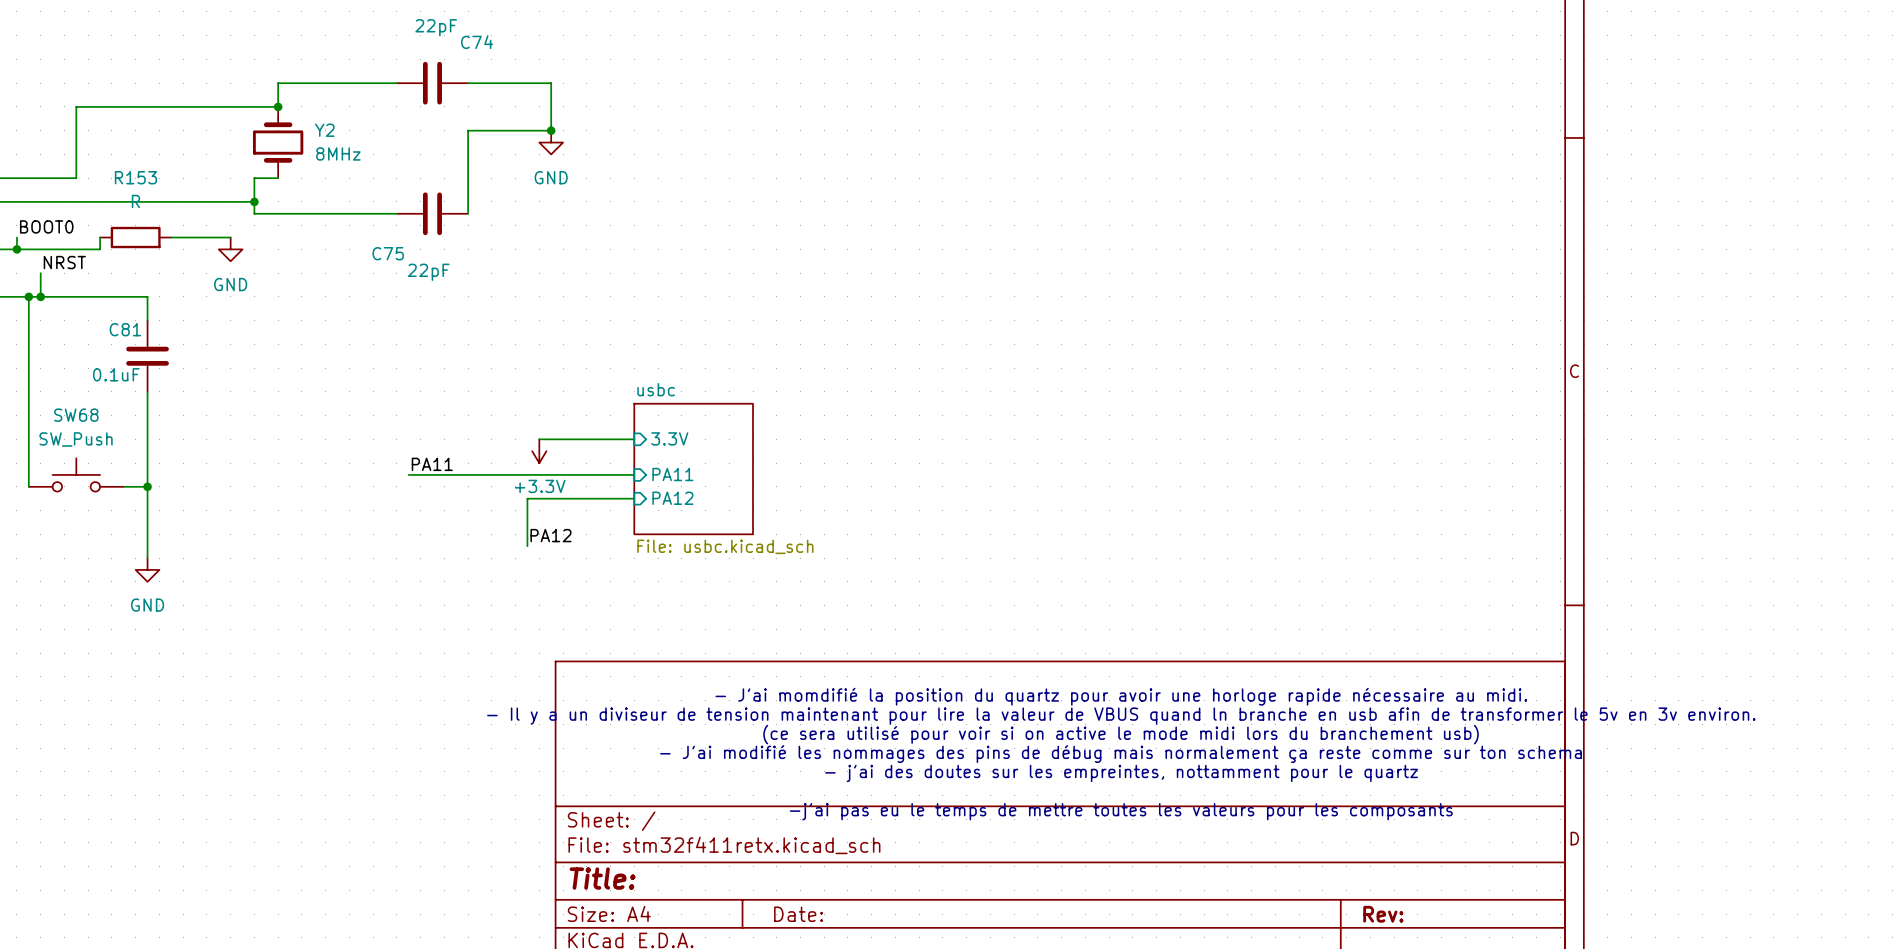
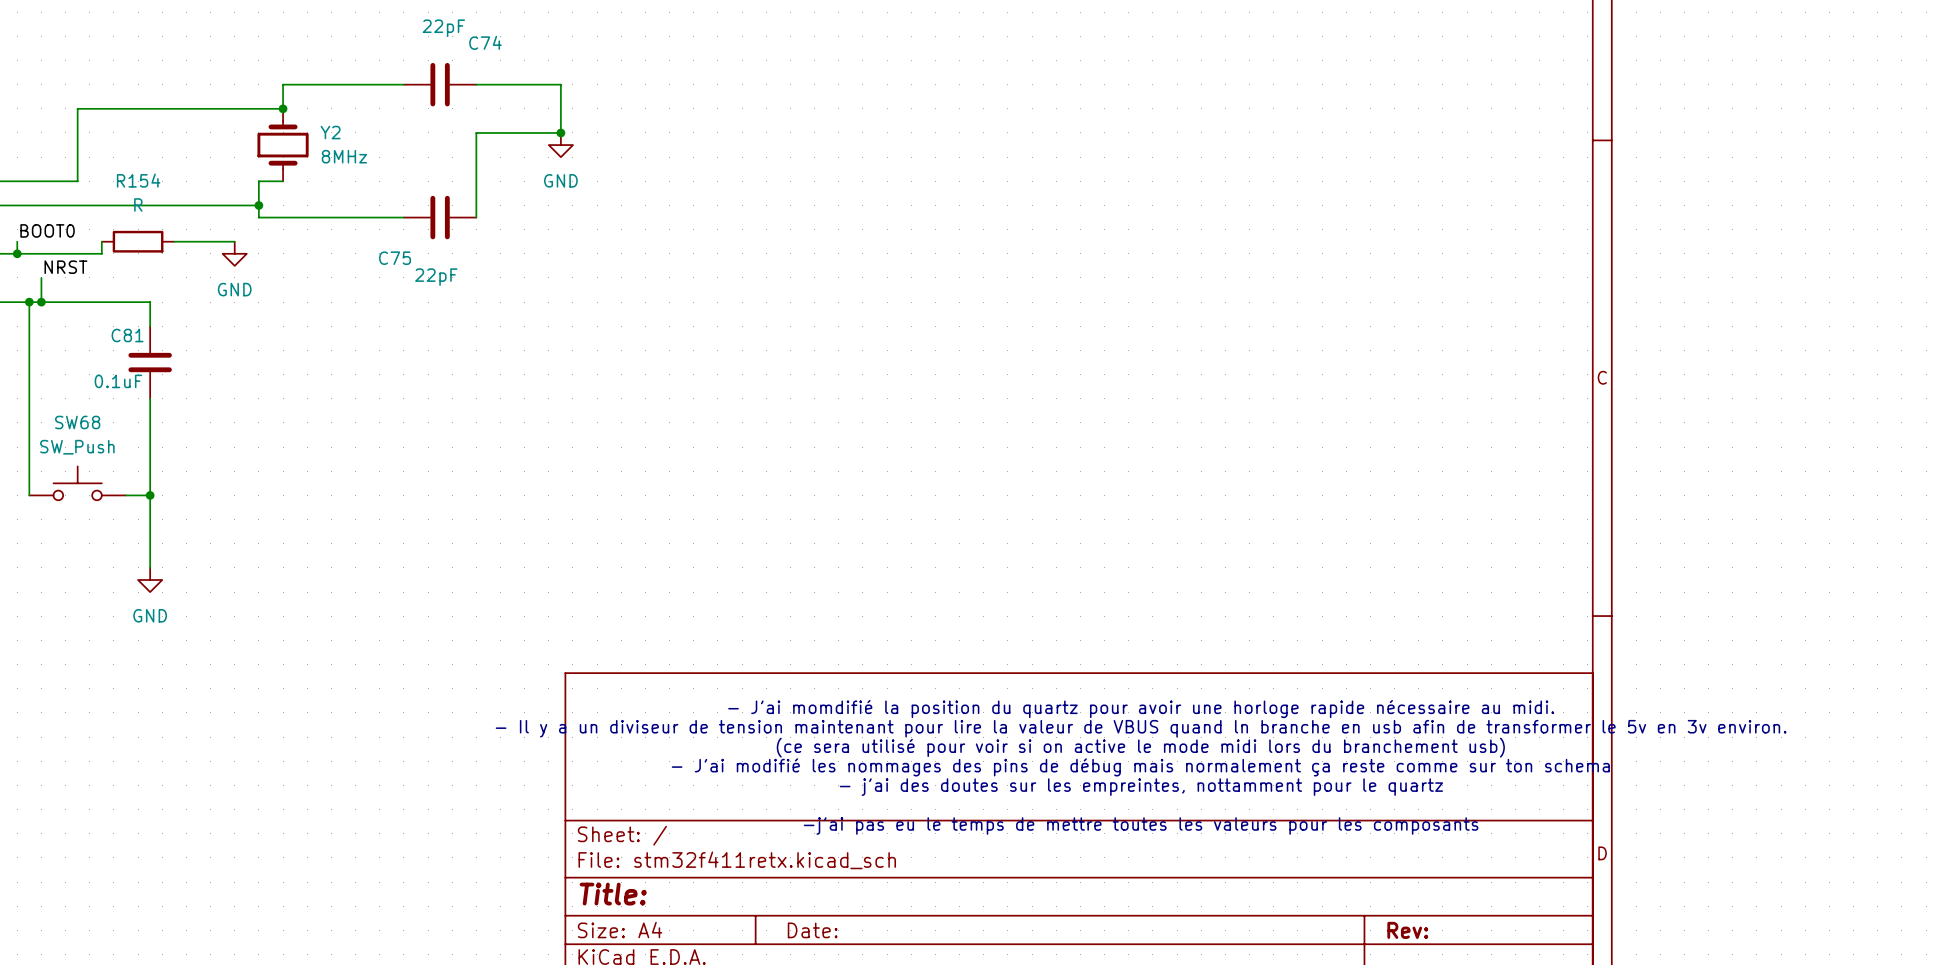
R153 name: R153 (135, 177) -> R154 (138, 180)
sheet pin: 3.3V (669, 438) -> none
wire: (539, 439) (634, 439) -> none
power symbol: +3.3V (539, 451) -> none
label: PA11 (432, 464) -> none
sheet usbc: File: usbc.kicad_sch (693, 469) -> none
wire: (408, 474) (634, 474) -> none
sheet pin: PA11 (672, 474) -> none
wire: (634, 498) (527, 498) (527, 546) -> none
sheet pin: PA12 (672, 498) -> none
label: PA12 (550, 535) -> none

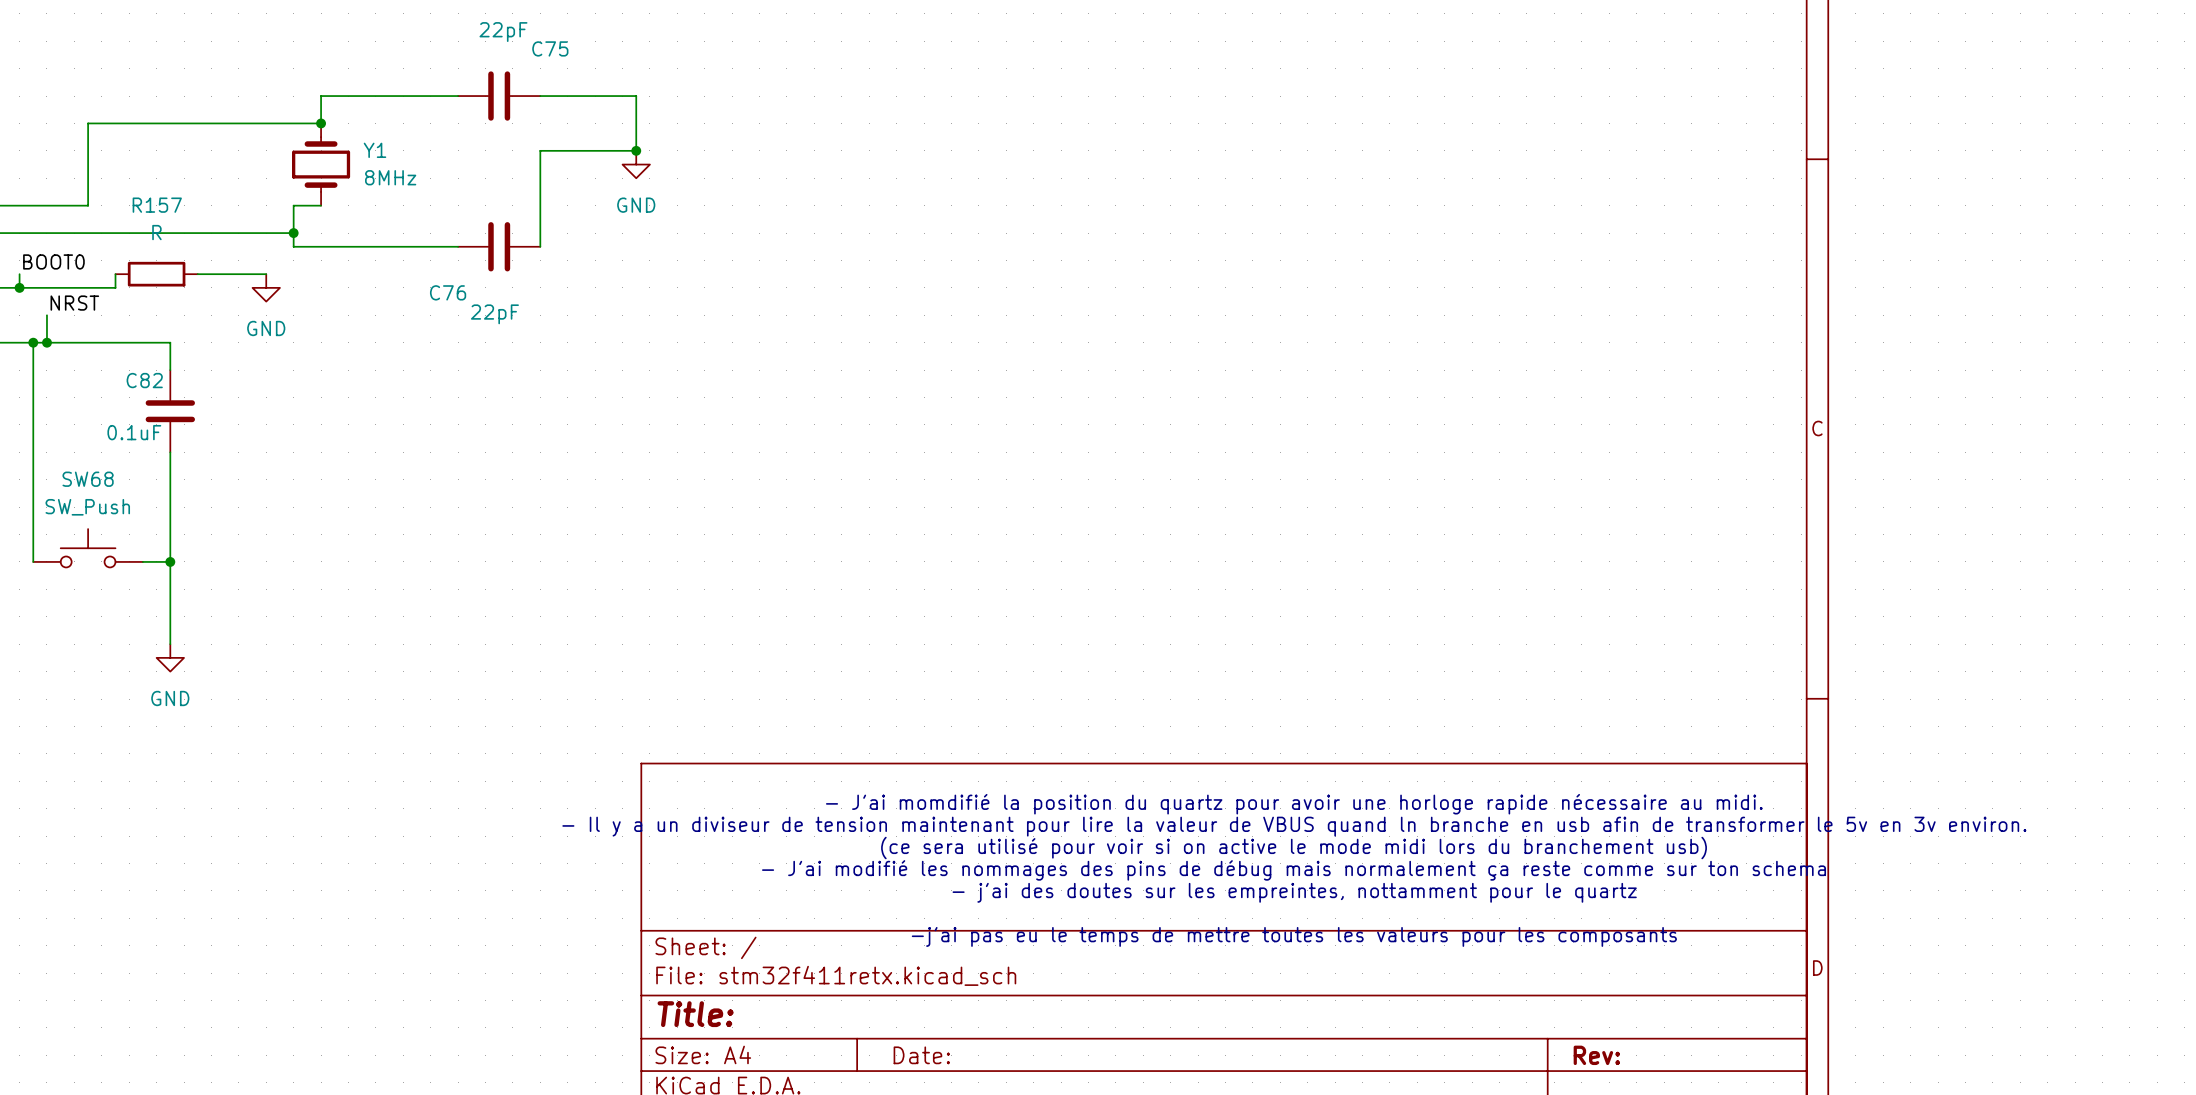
C74 name: C74 (485, 42) -> C75 (550, 48)
Y2 name: Y2 (330, 132) -> Y1 (374, 150)
R154 name: R154 (138, 180) -> R157 (157, 205)
C75 name: C75 (395, 258) -> C76 (448, 292)
C81 name: C81 (127, 335) -> C82 (144, 380)

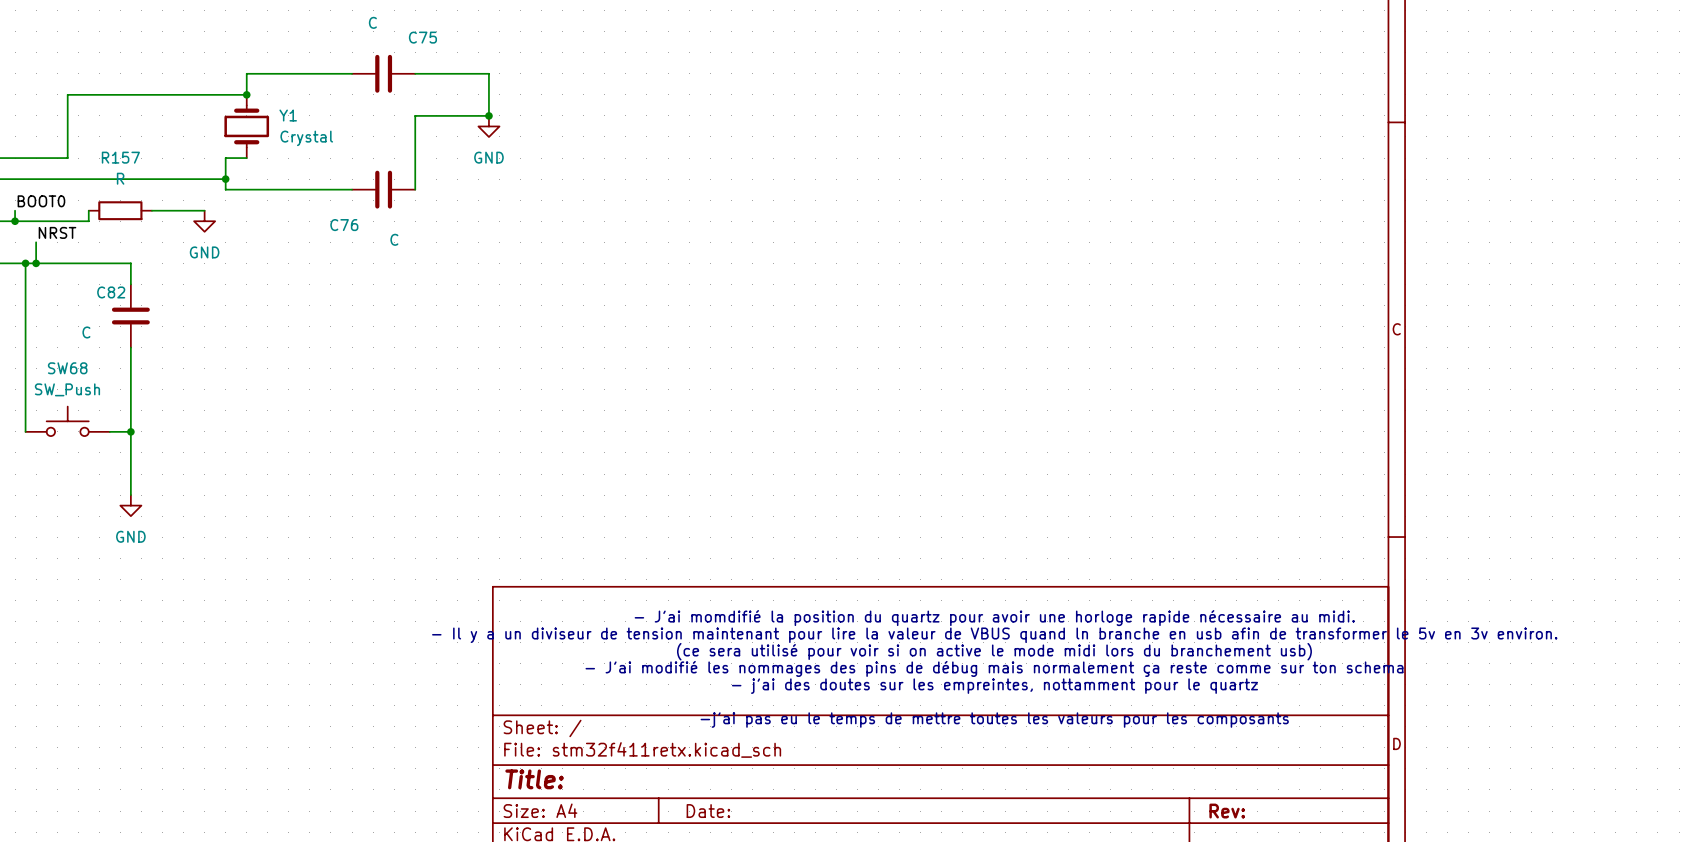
C75 value: 22pF (503, 32) -> C (372, 22)
Y1 value: 8MHz (390, 177) -> Crystal (306, 138)
C76 value: 22pF (494, 314) -> C (394, 239)
C82 value: 0.1uF (134, 432) -> C (86, 332)

